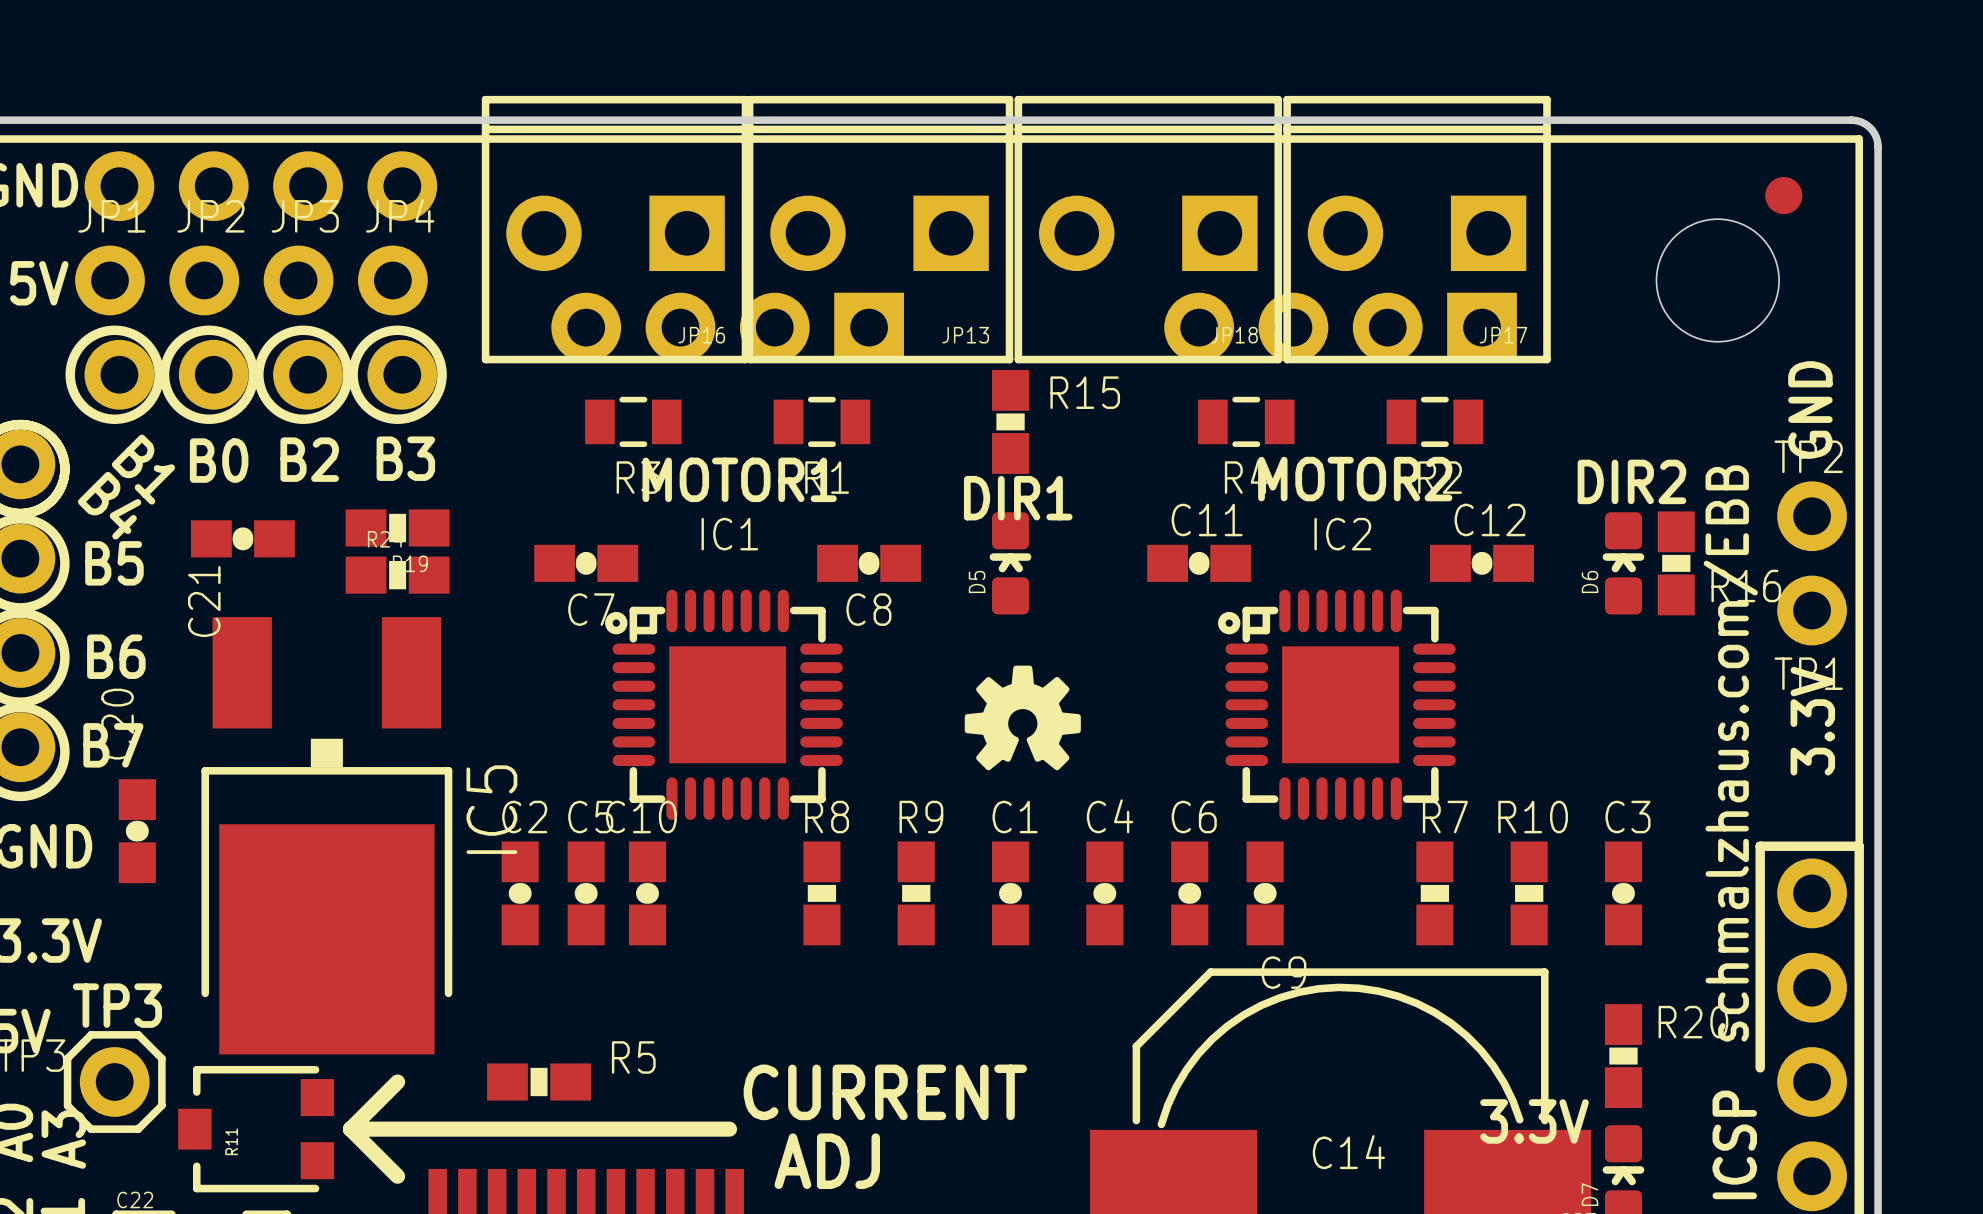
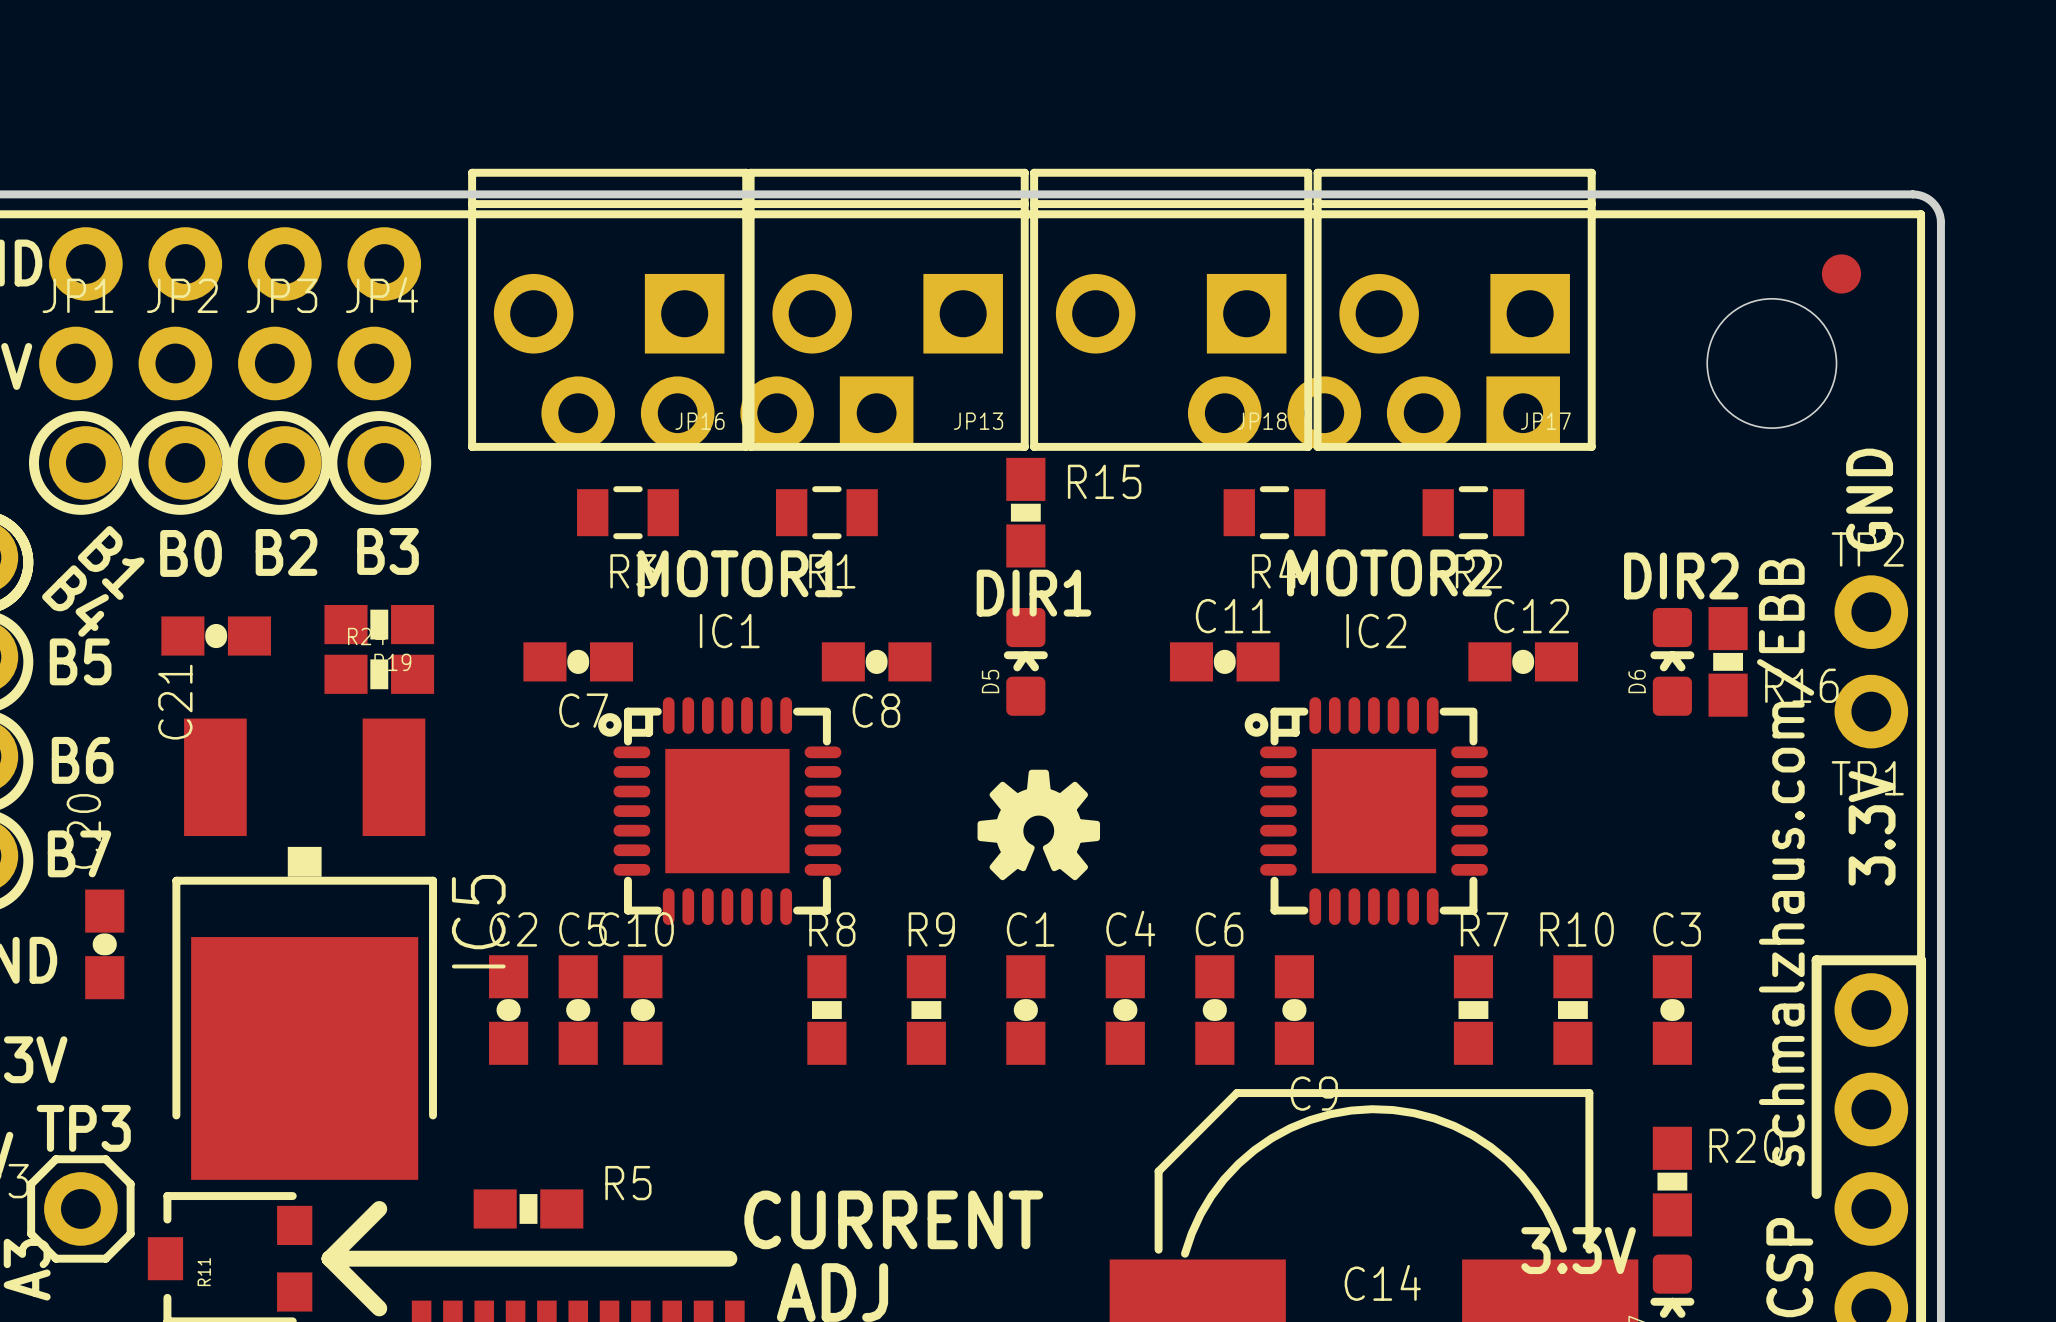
IC1 footprint: [605, 589, 843, 820] -> [598, 697, 842, 926]
IC2 footprint: [1218, 589, 1456, 820] -> [1244, 697, 1488, 926]

